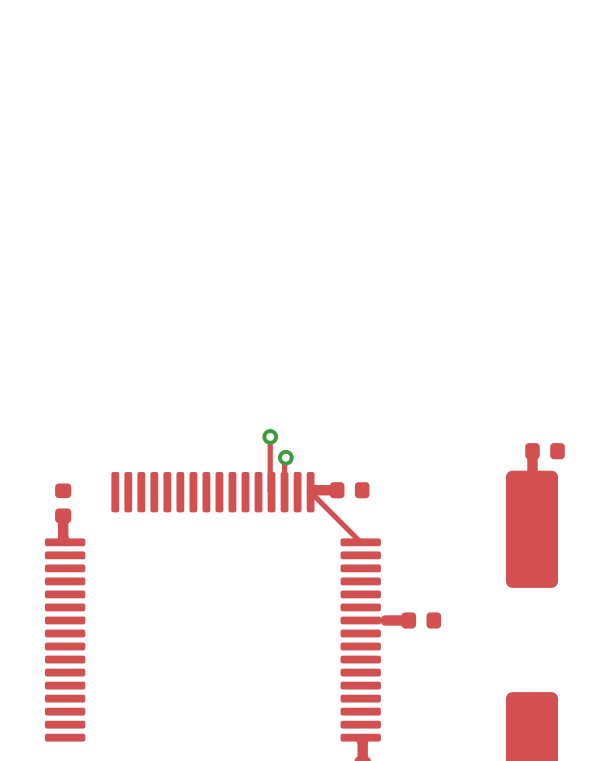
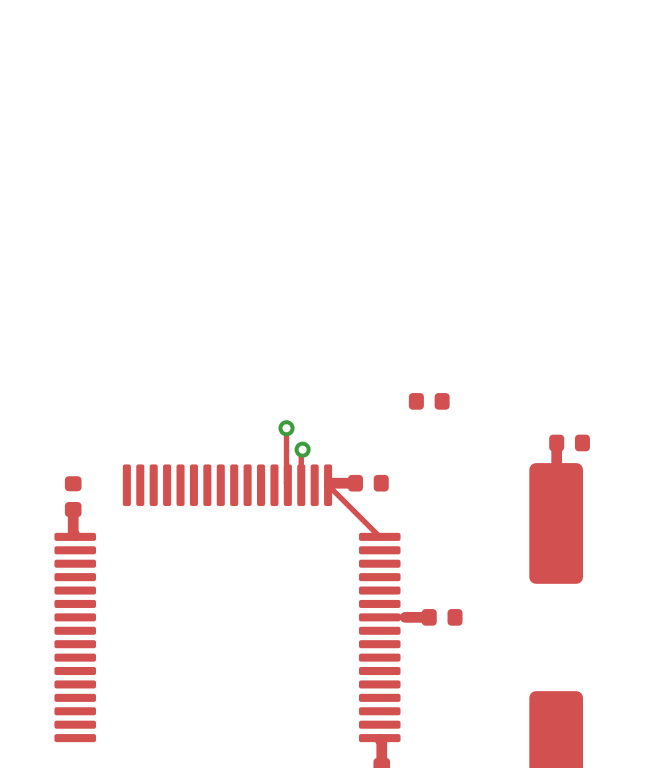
part: none -> (429, 401)

